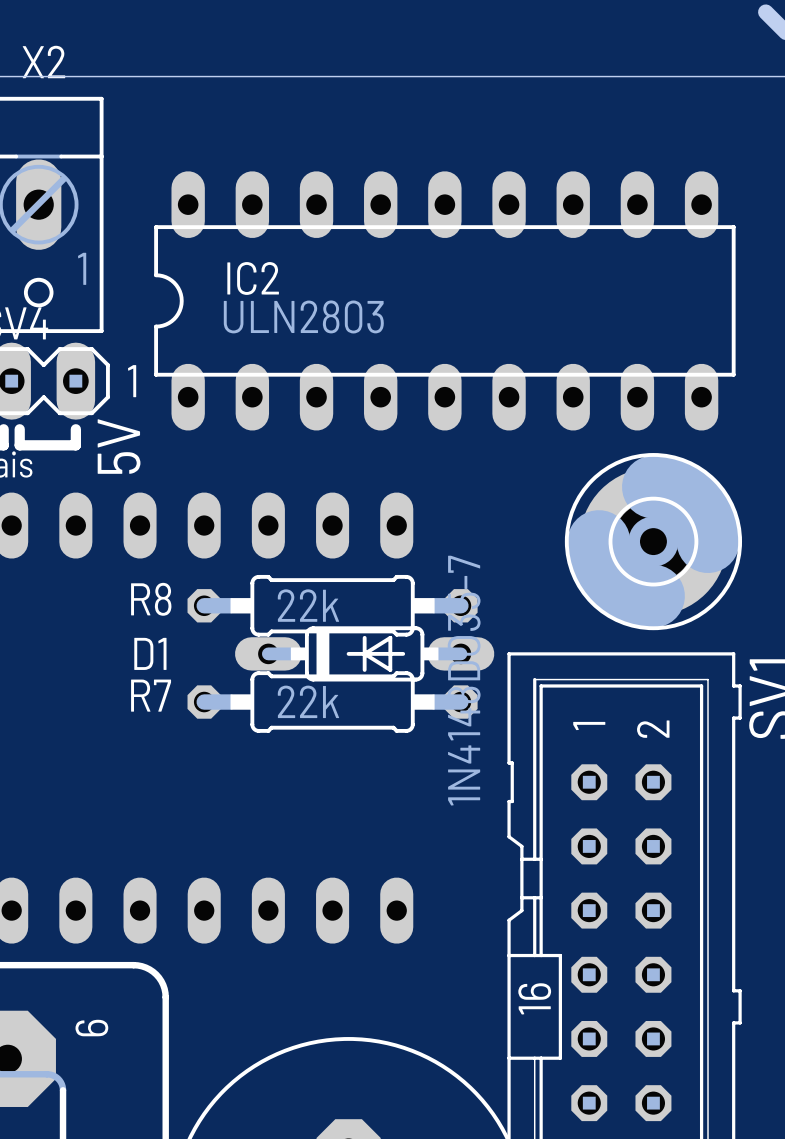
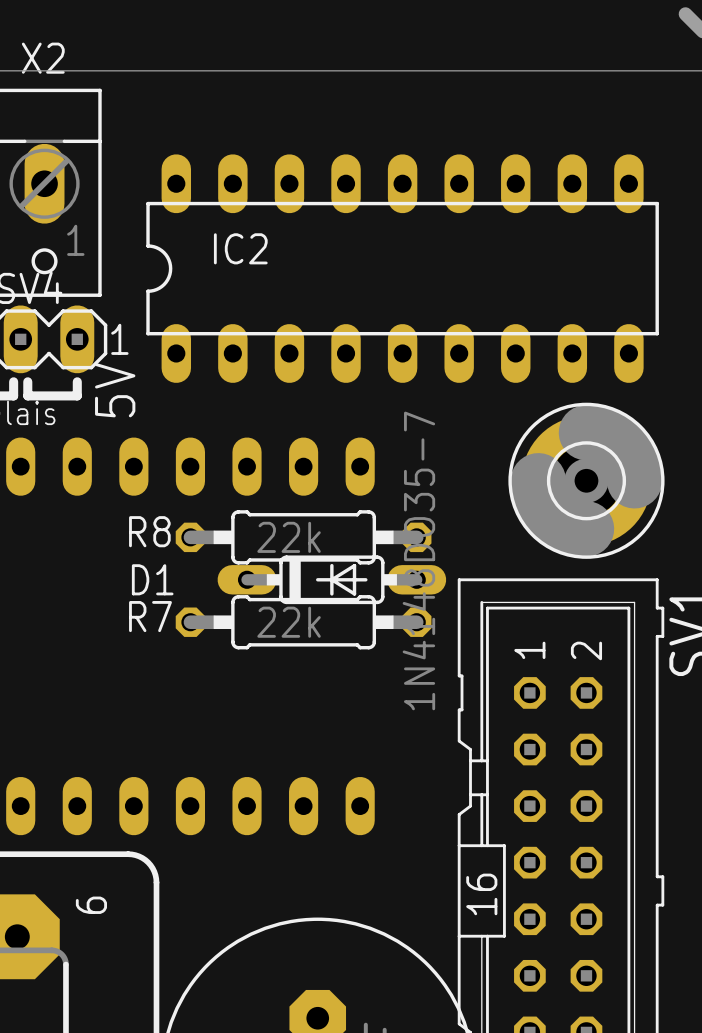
IC2 value: ULN2803 (303, 316) -> none

